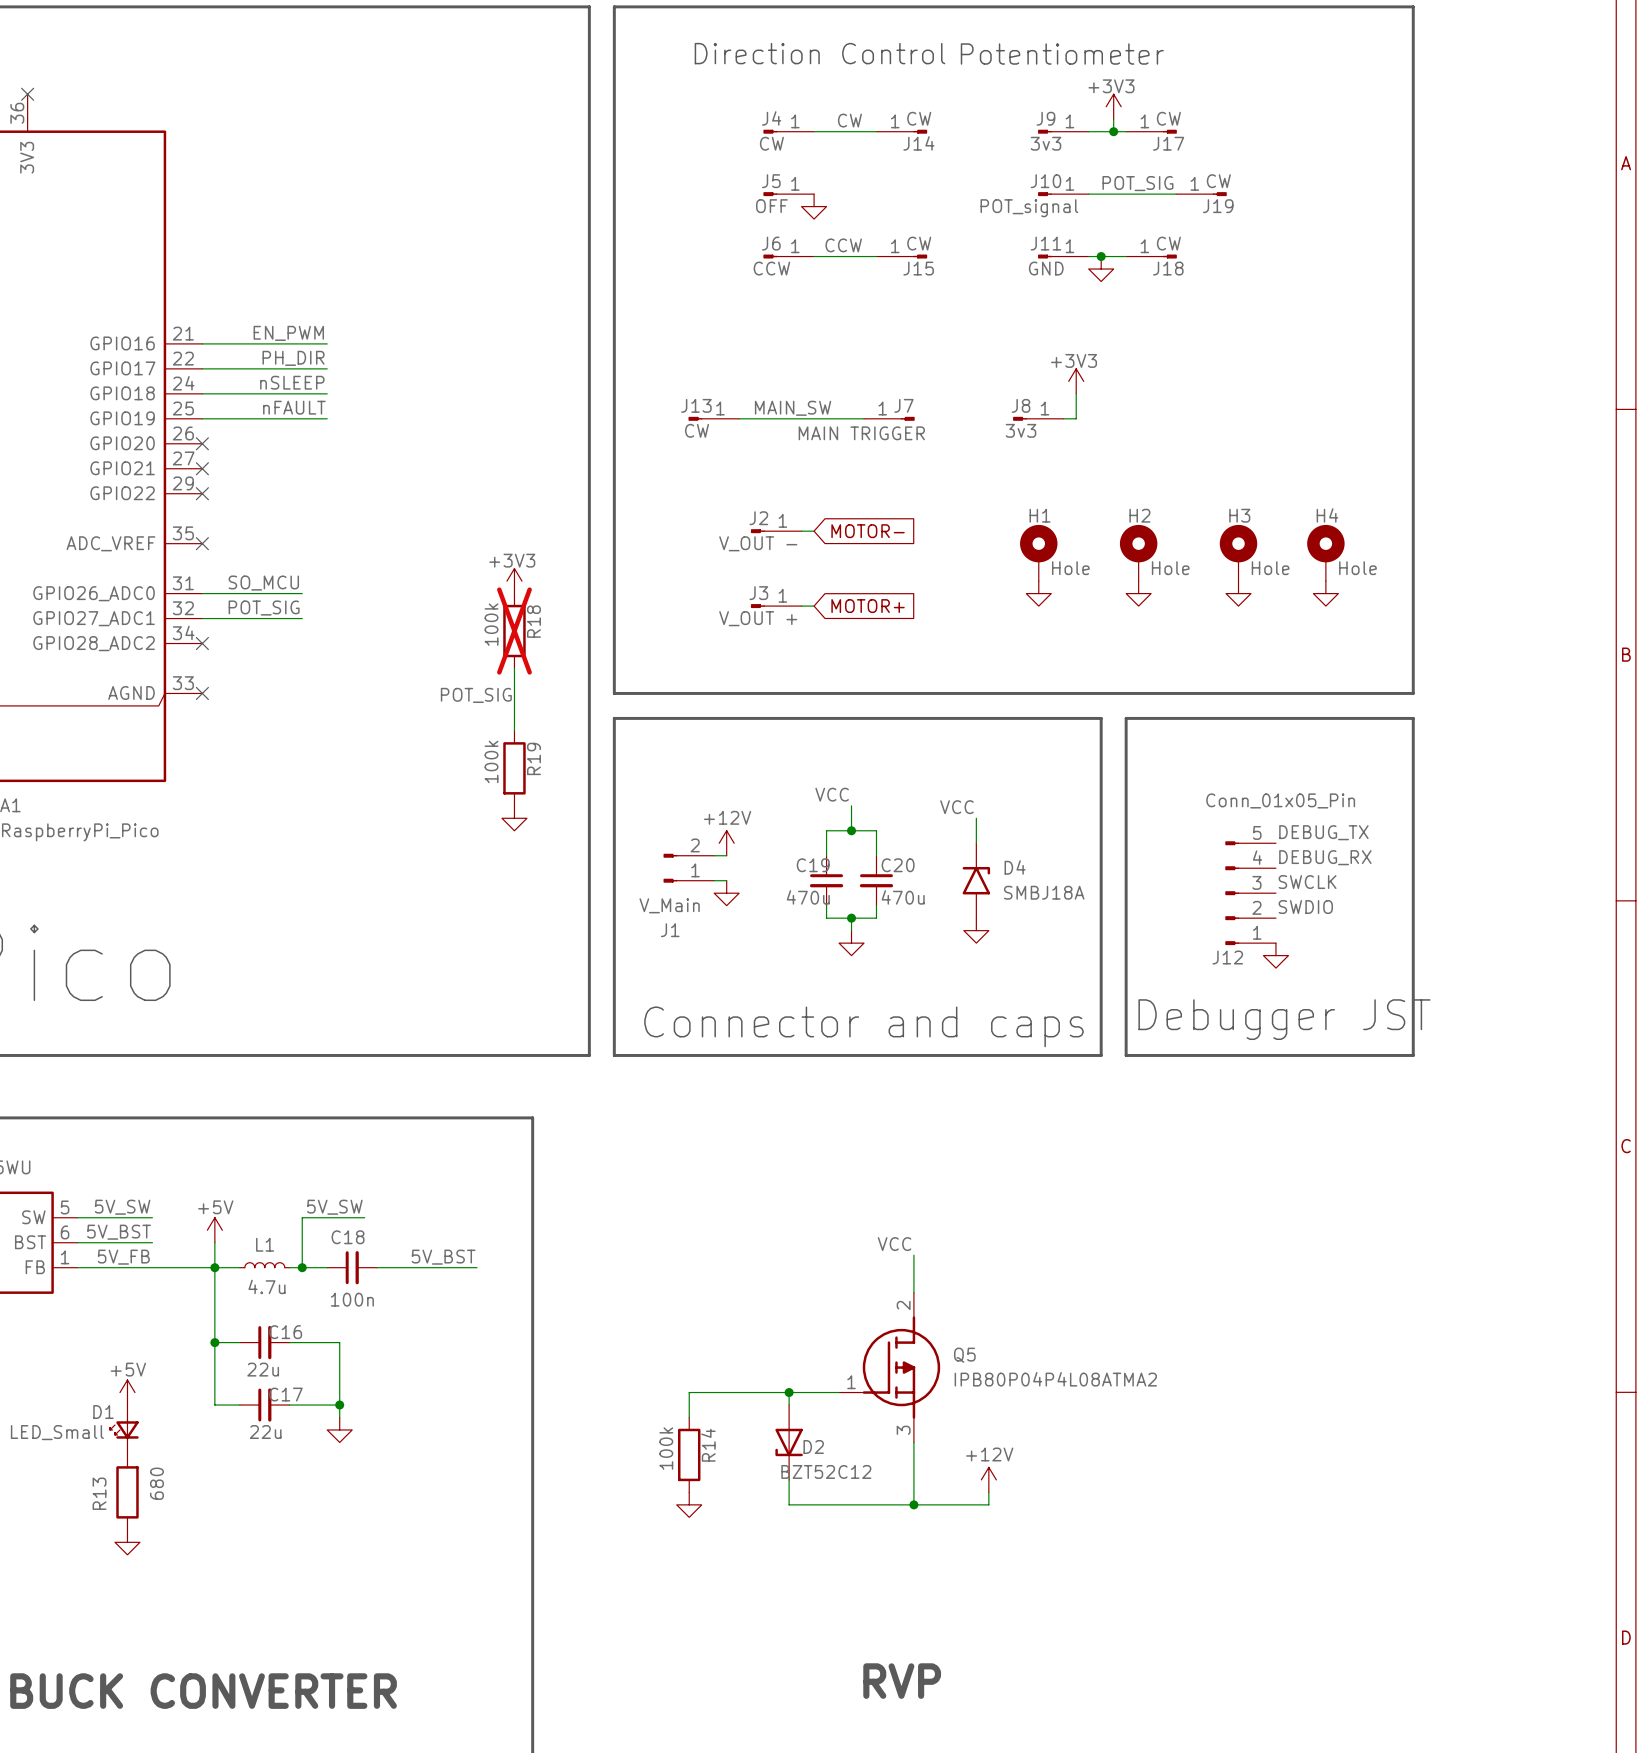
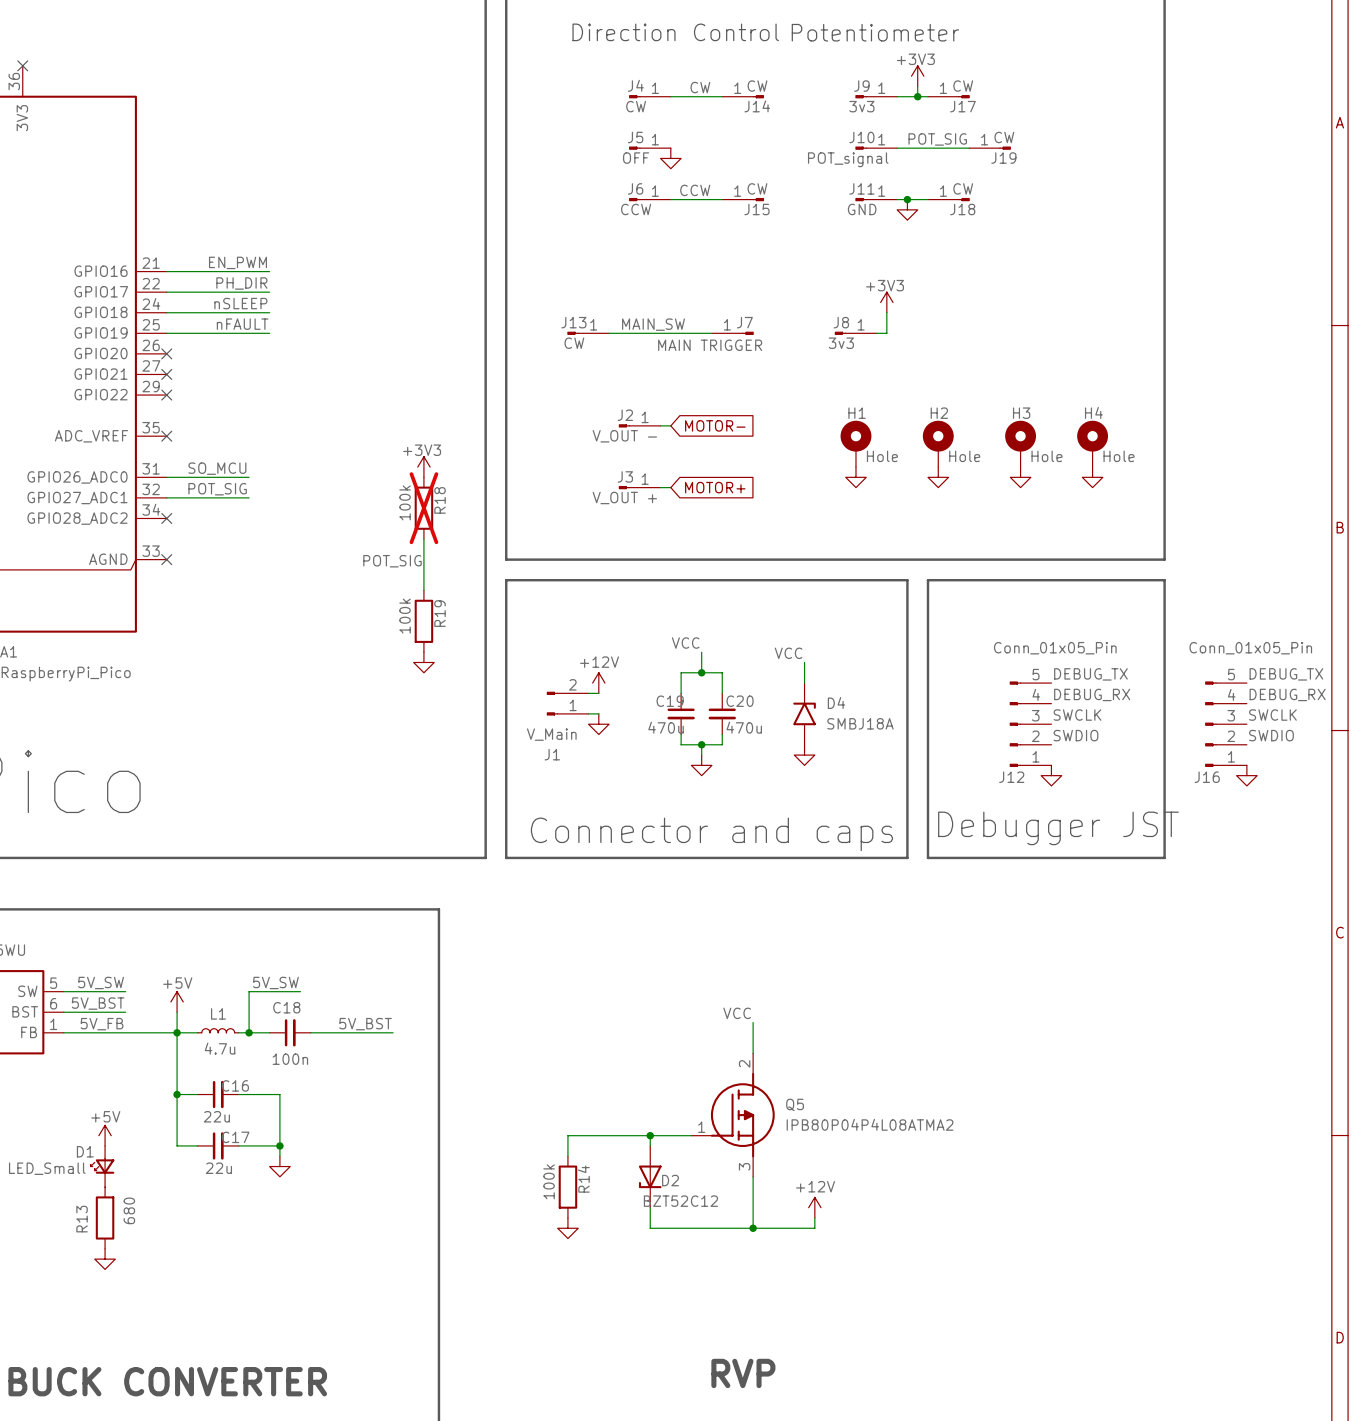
label: none -> DEBUG_TX (1286, 674)
label: none -> DEBUG_RX (1287, 694)
label: none -> SWCLK (1272, 715)
J16: none -> Conn_01x05_Pin (1226, 724)
label: none -> SWDIO (1271, 735)
power symbol: none -> (1246, 775)

